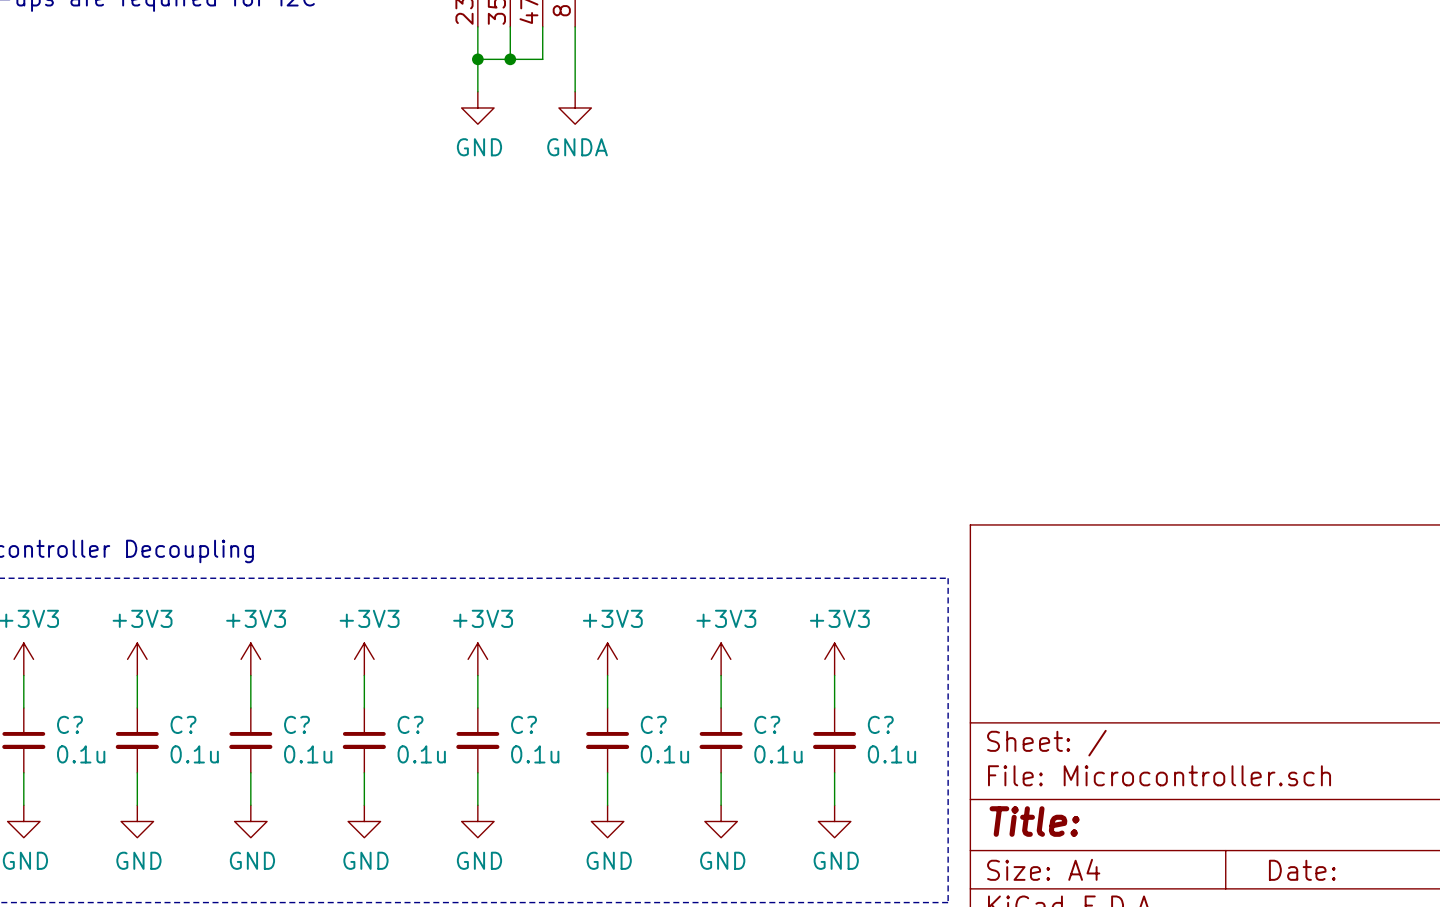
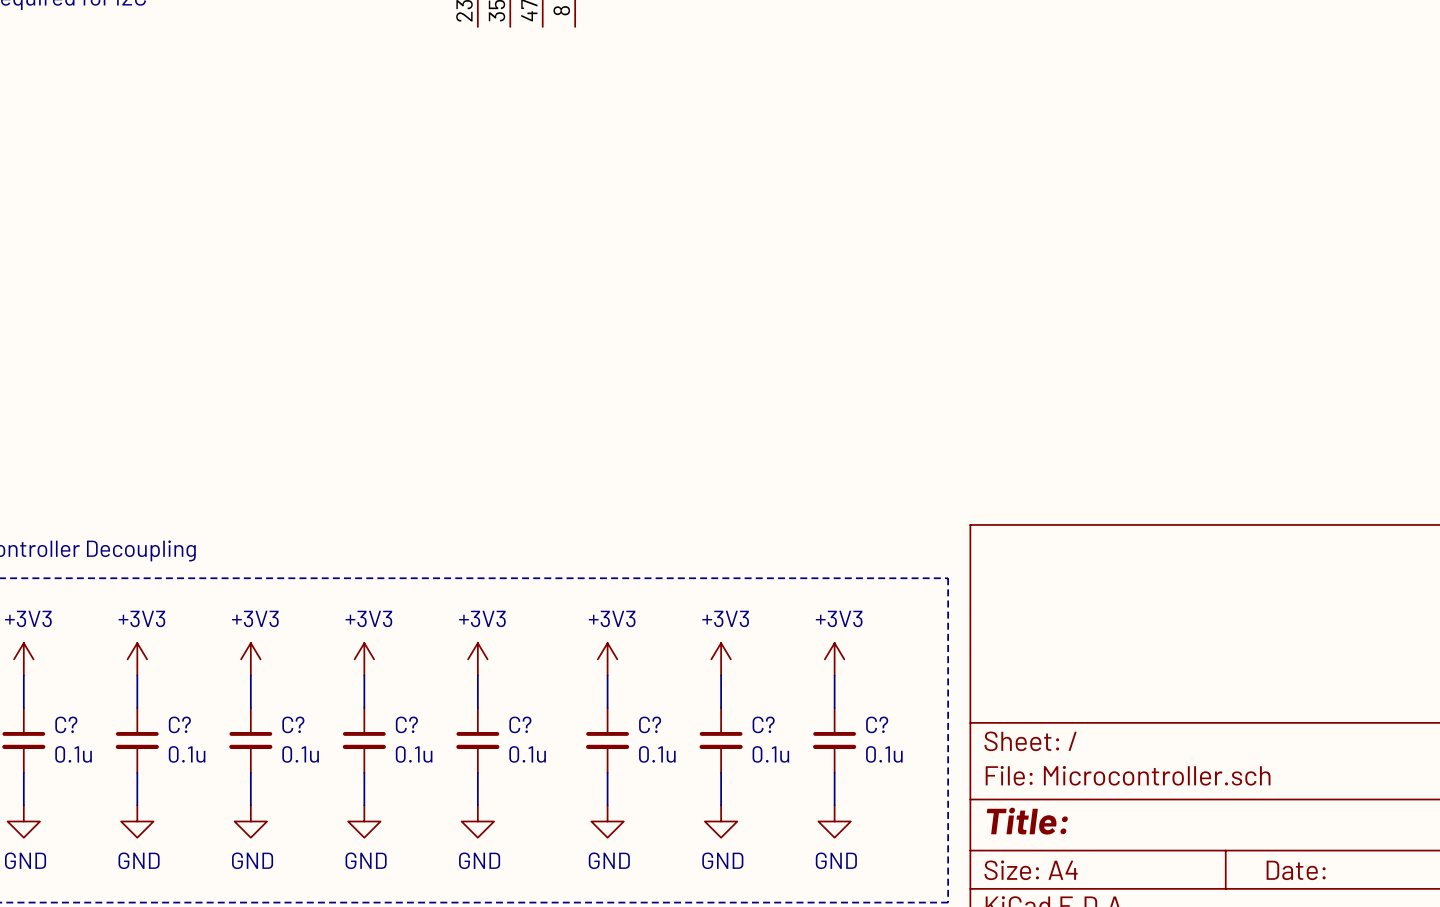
wire: (477, 26) (477, 91) -> none
wire: (510, 26) (510, 59) -> none
wire: (542, 26) (542, 59) (477, 59) -> none
wire: (575, 26) (575, 91) -> none
junction: (477, 59) -> none
junction: (510, 59) -> none
power symbol: GND (477, 107) -> none
power symbol: GNDA (575, 107) -> none

